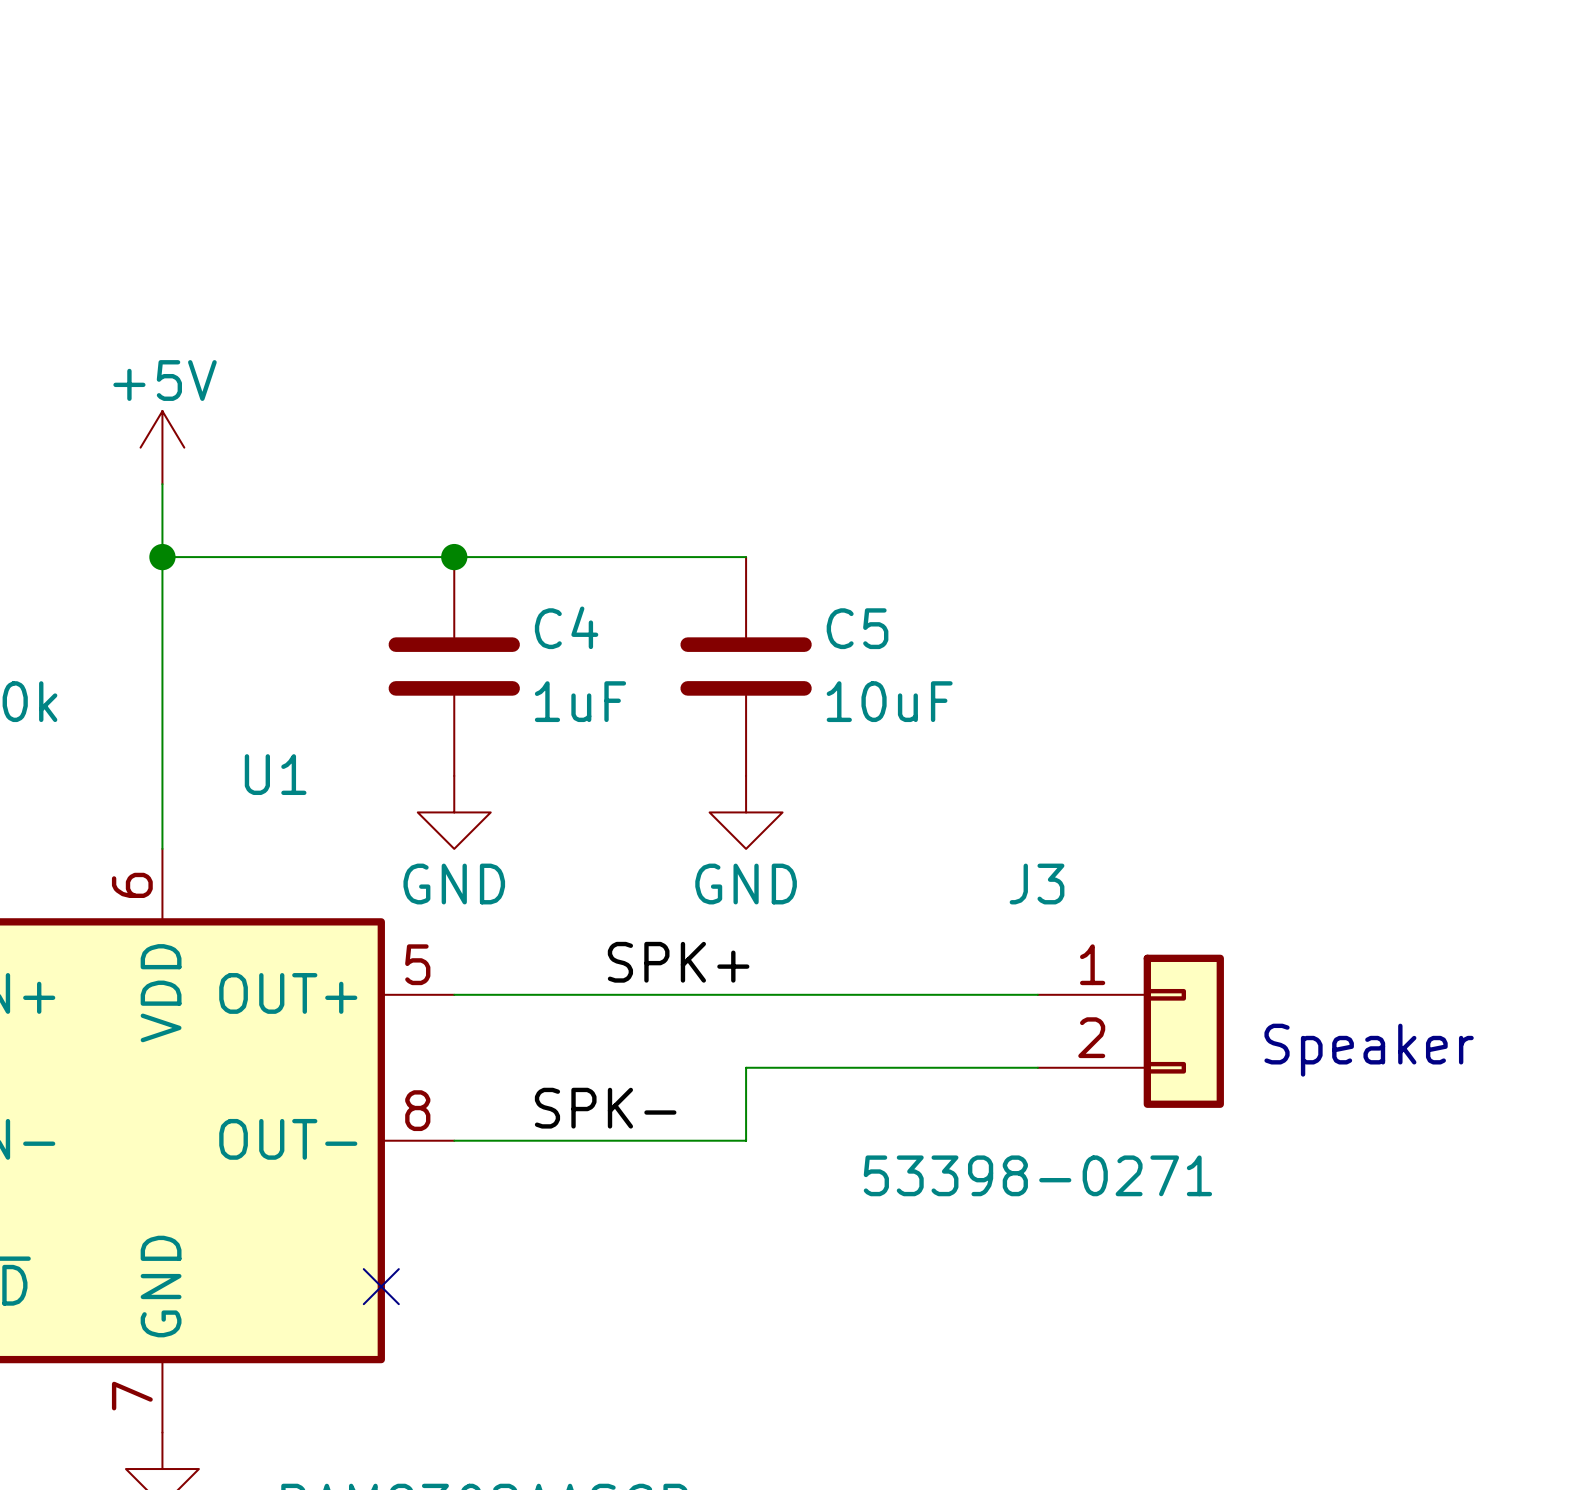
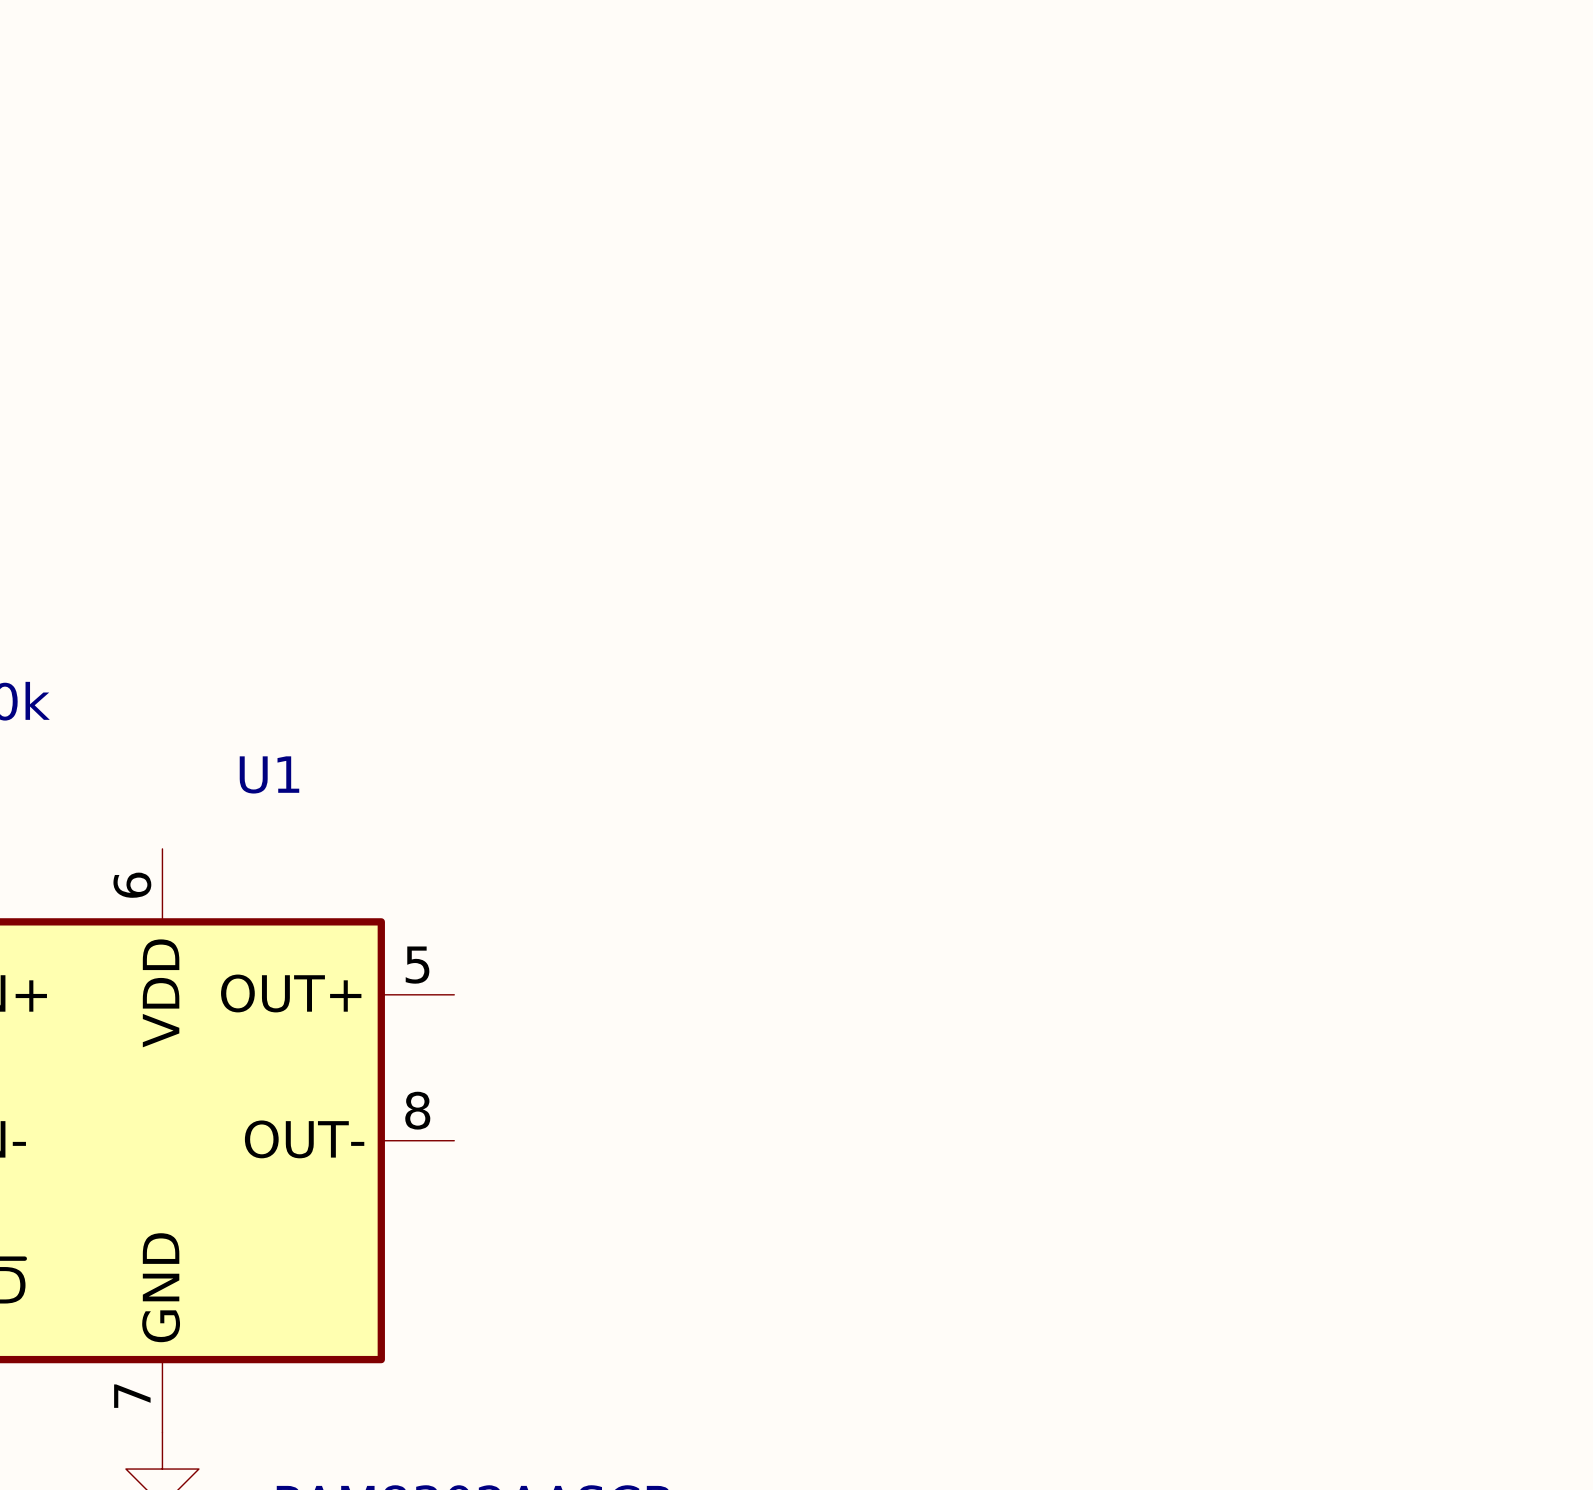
power symbol: +5V (162, 447) -> none
wire: (162, 484) (162, 848) -> none
wire: (162, 557) (746, 557) -> none
junction: (162, 557) -> none
junction: (454, 557) -> none
C4: 1uF (454, 666) -> none
C5: 10uF (746, 666) -> none
power symbol: GND (454, 812) -> none
power symbol: GND (746, 812) -> none
label: SPK+ (678, 962) -> none
wire: (454, 994) (1037, 994) -> none
J3: 53398-0271 (1130, 1031) -> none
text: Speaker (1369, 1050) -> none
wire: (1037, 1067) (746, 1067) (746, 1140) (454, 1140) -> none
label: SPK- (605, 1108) -> none
no-connect mark: (381, 1286) -> none

